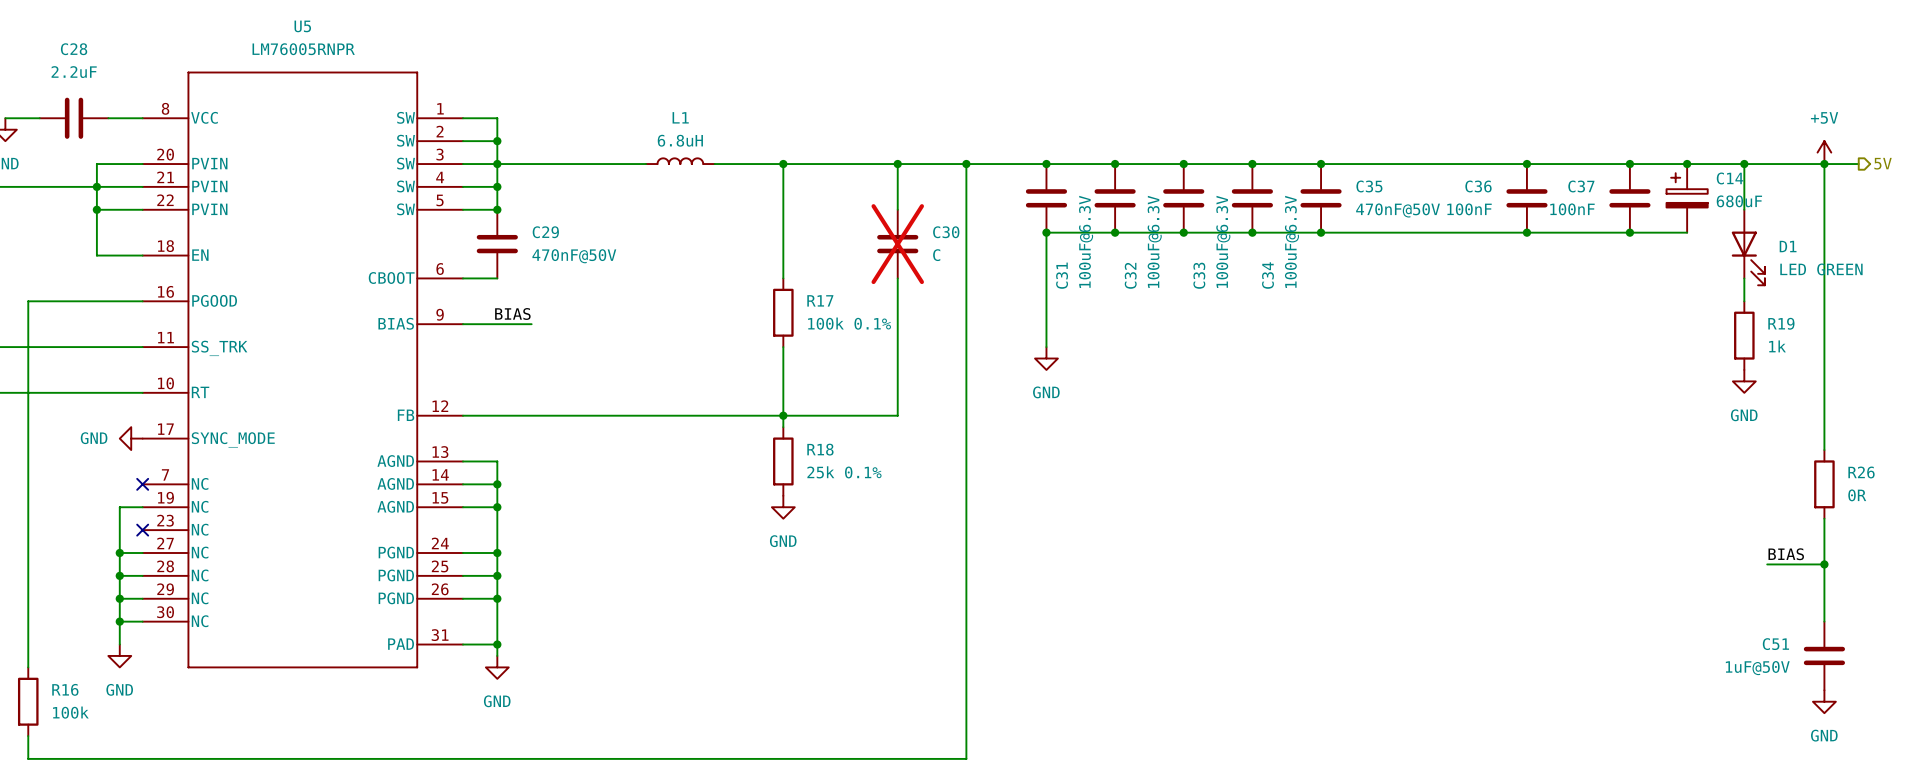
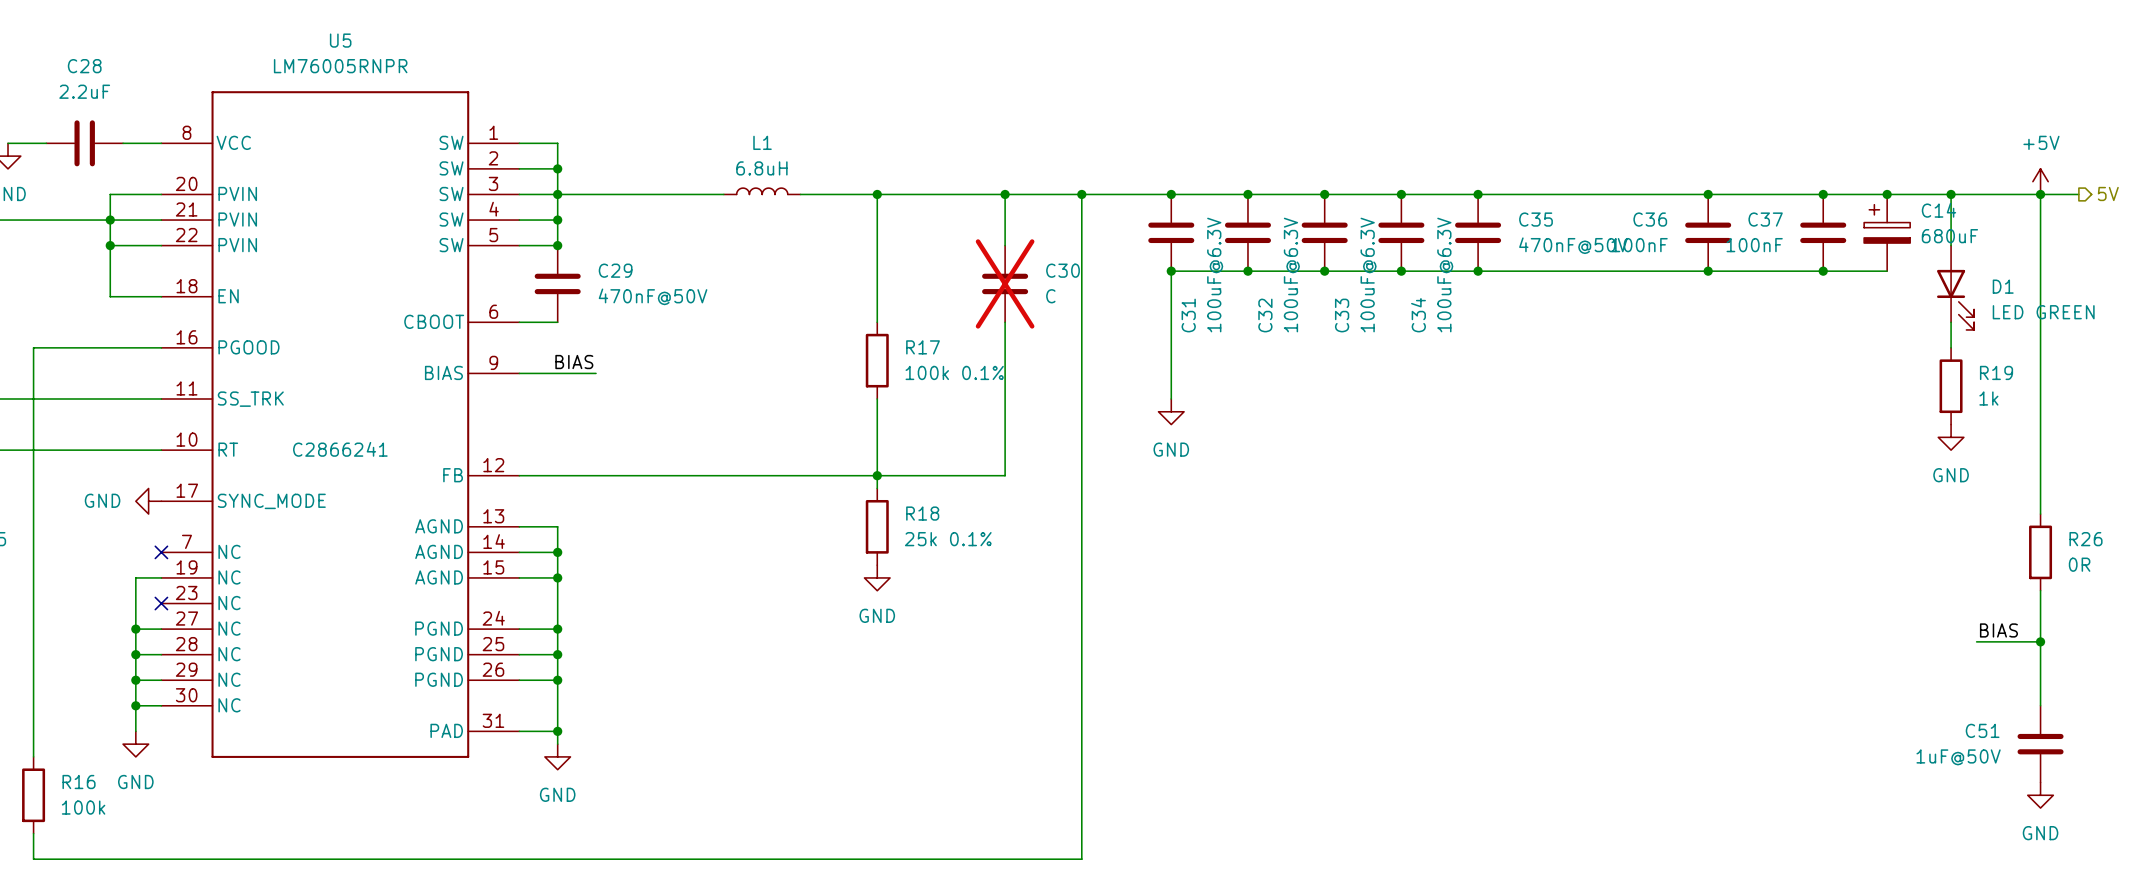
U5 text: none -> C2866241 (340, 449)

